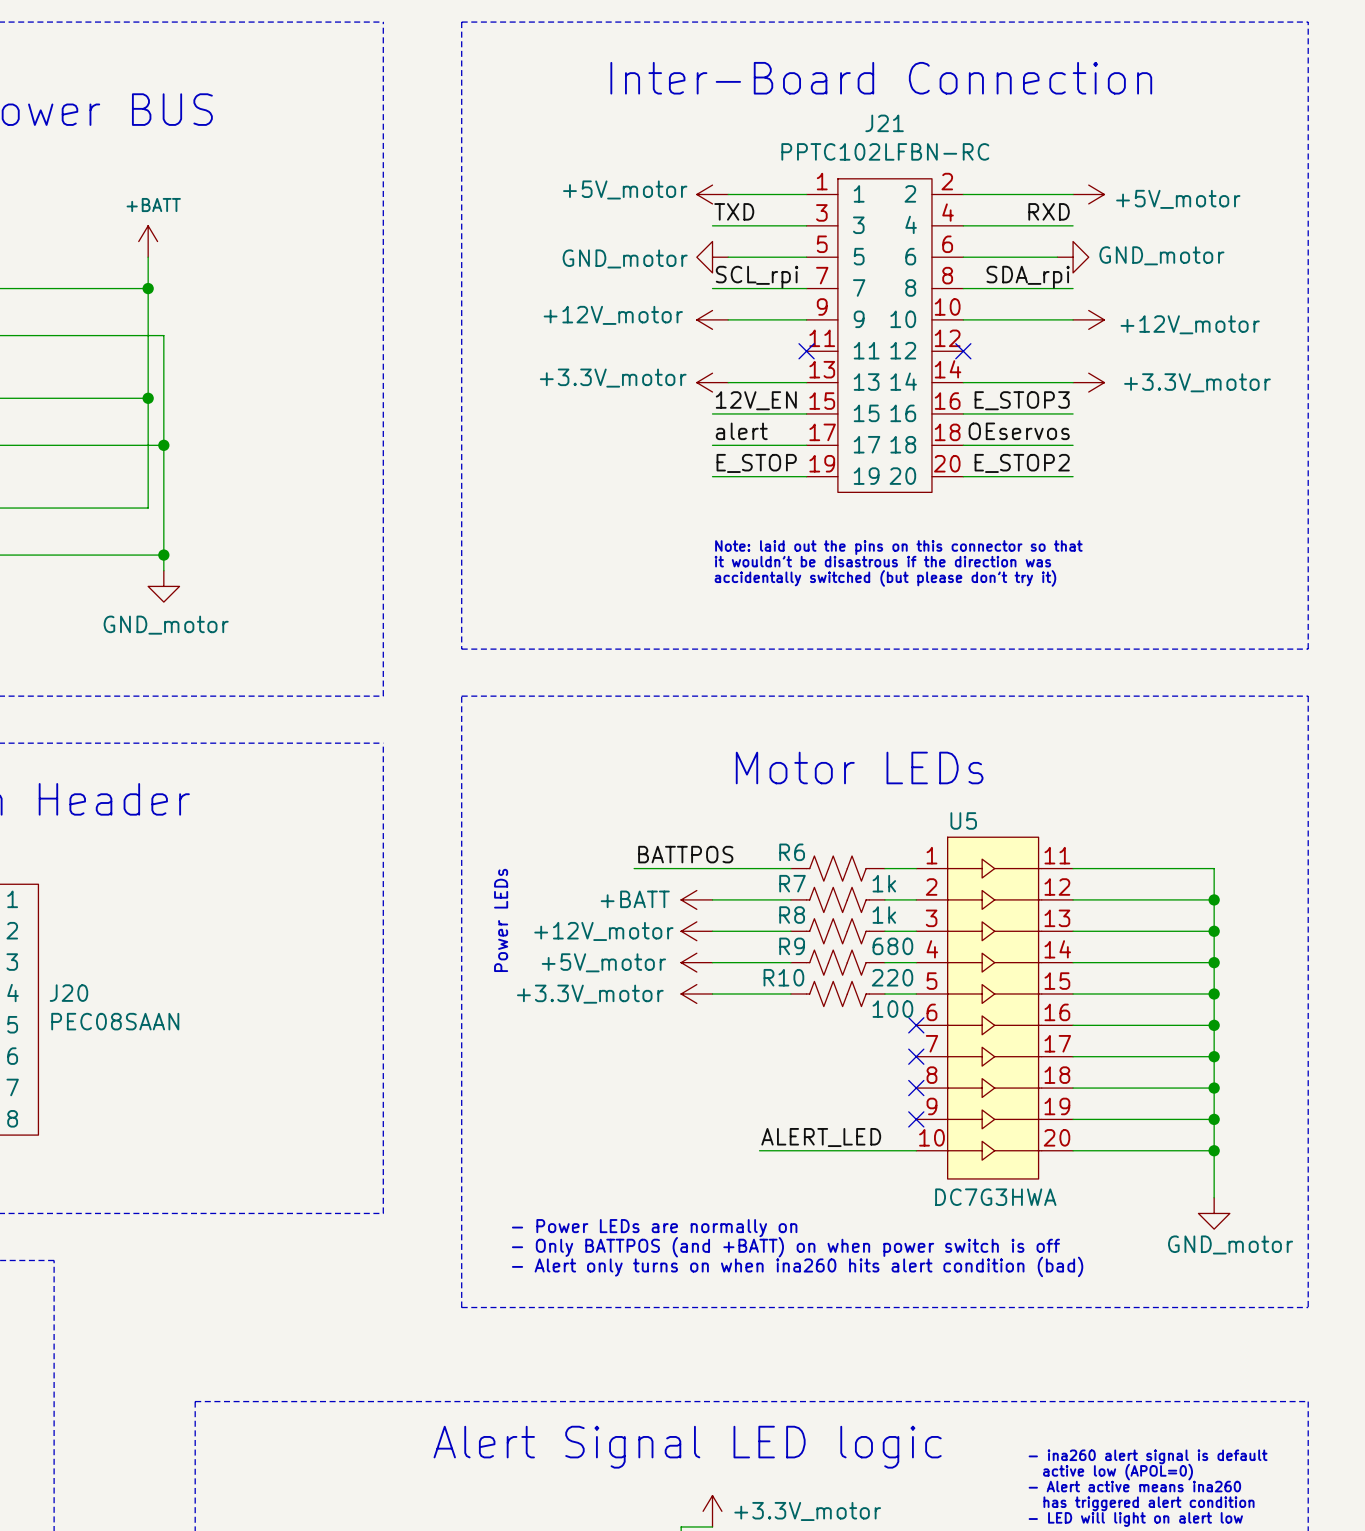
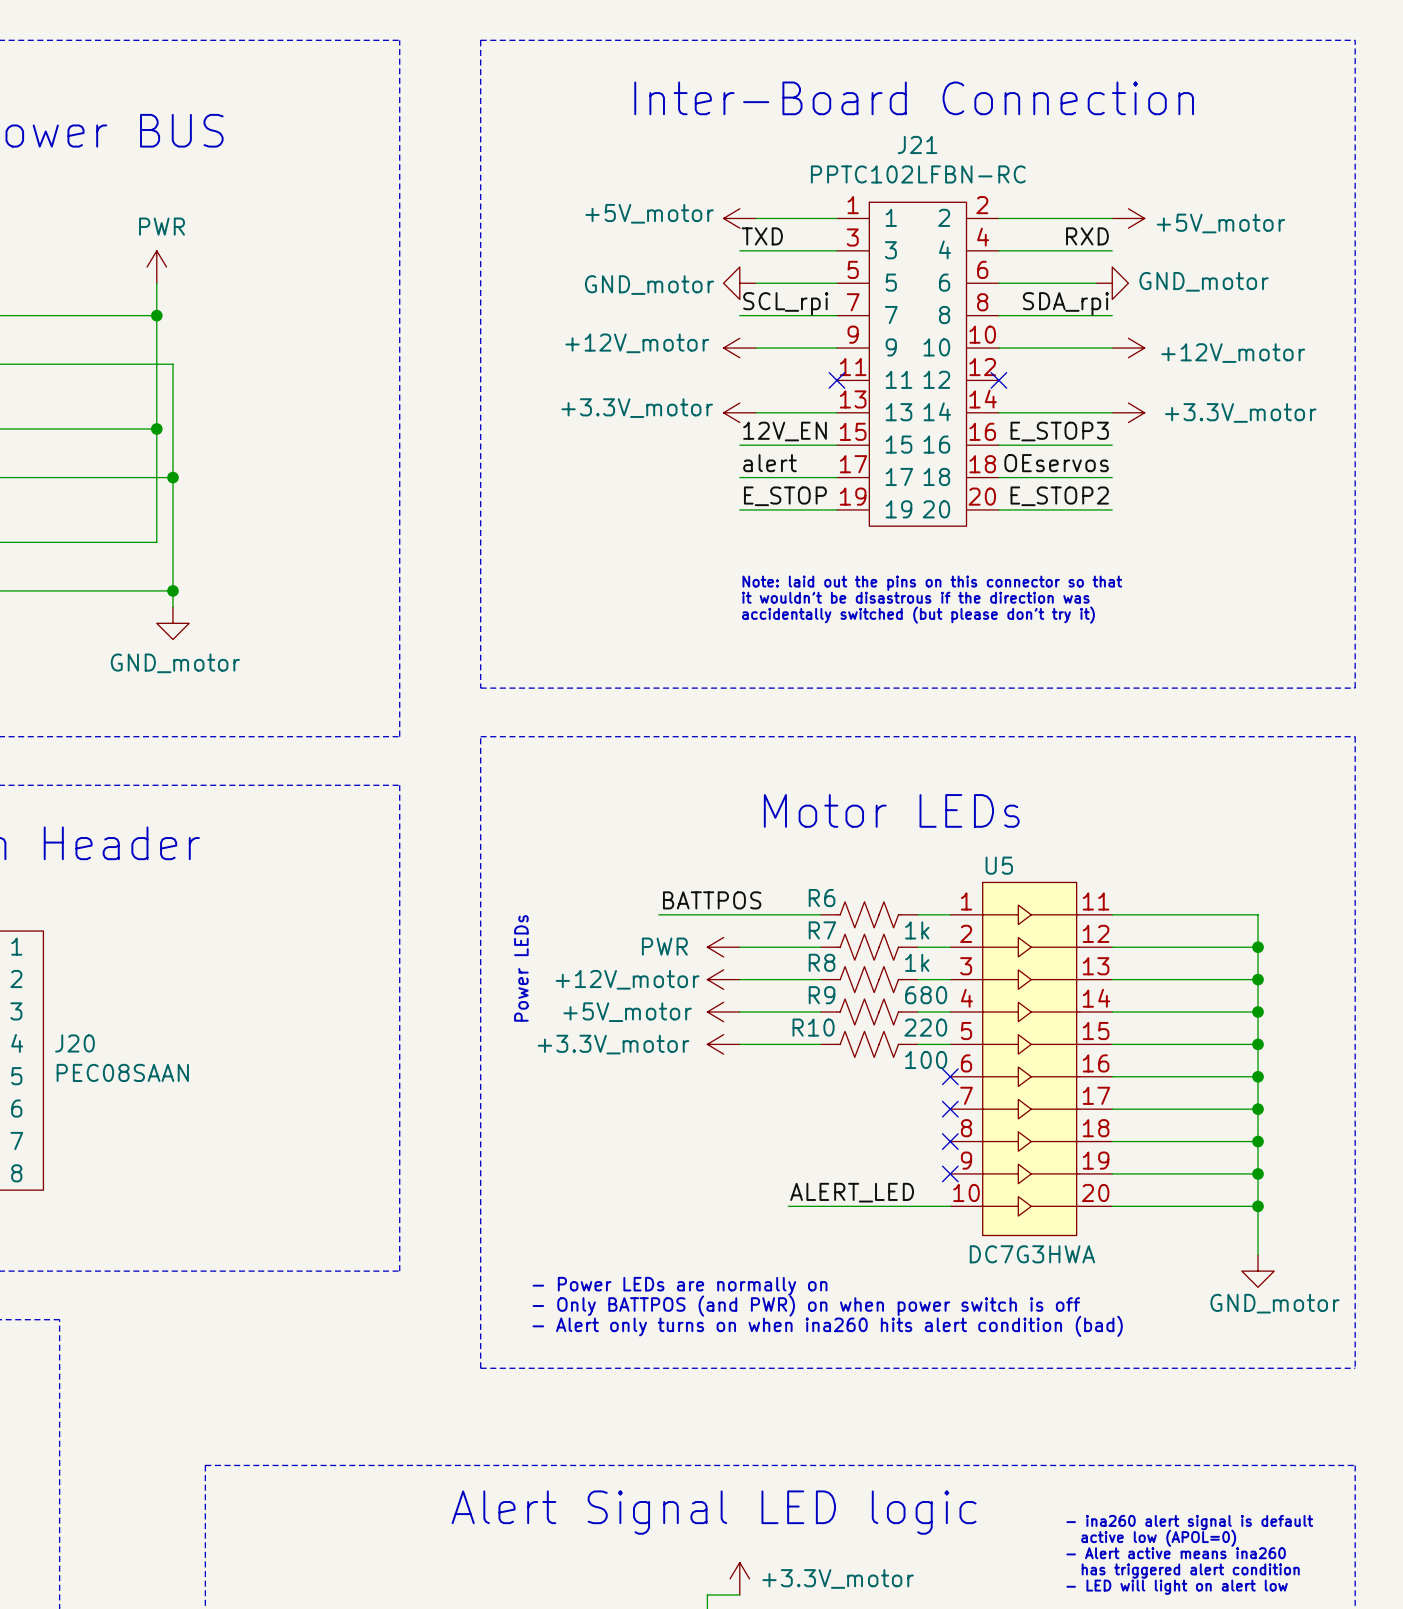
power symbol: +BATT (148, 241) -> PWR (156, 267)
power symbol: +BATT (696, 899) -> PWR (723, 947)
text: - Only BATTPOS (and +BATT) on when power switch is off (785, 1247) -> - Only BATTPOS (and PWR) on when power switch is off (806, 1306)

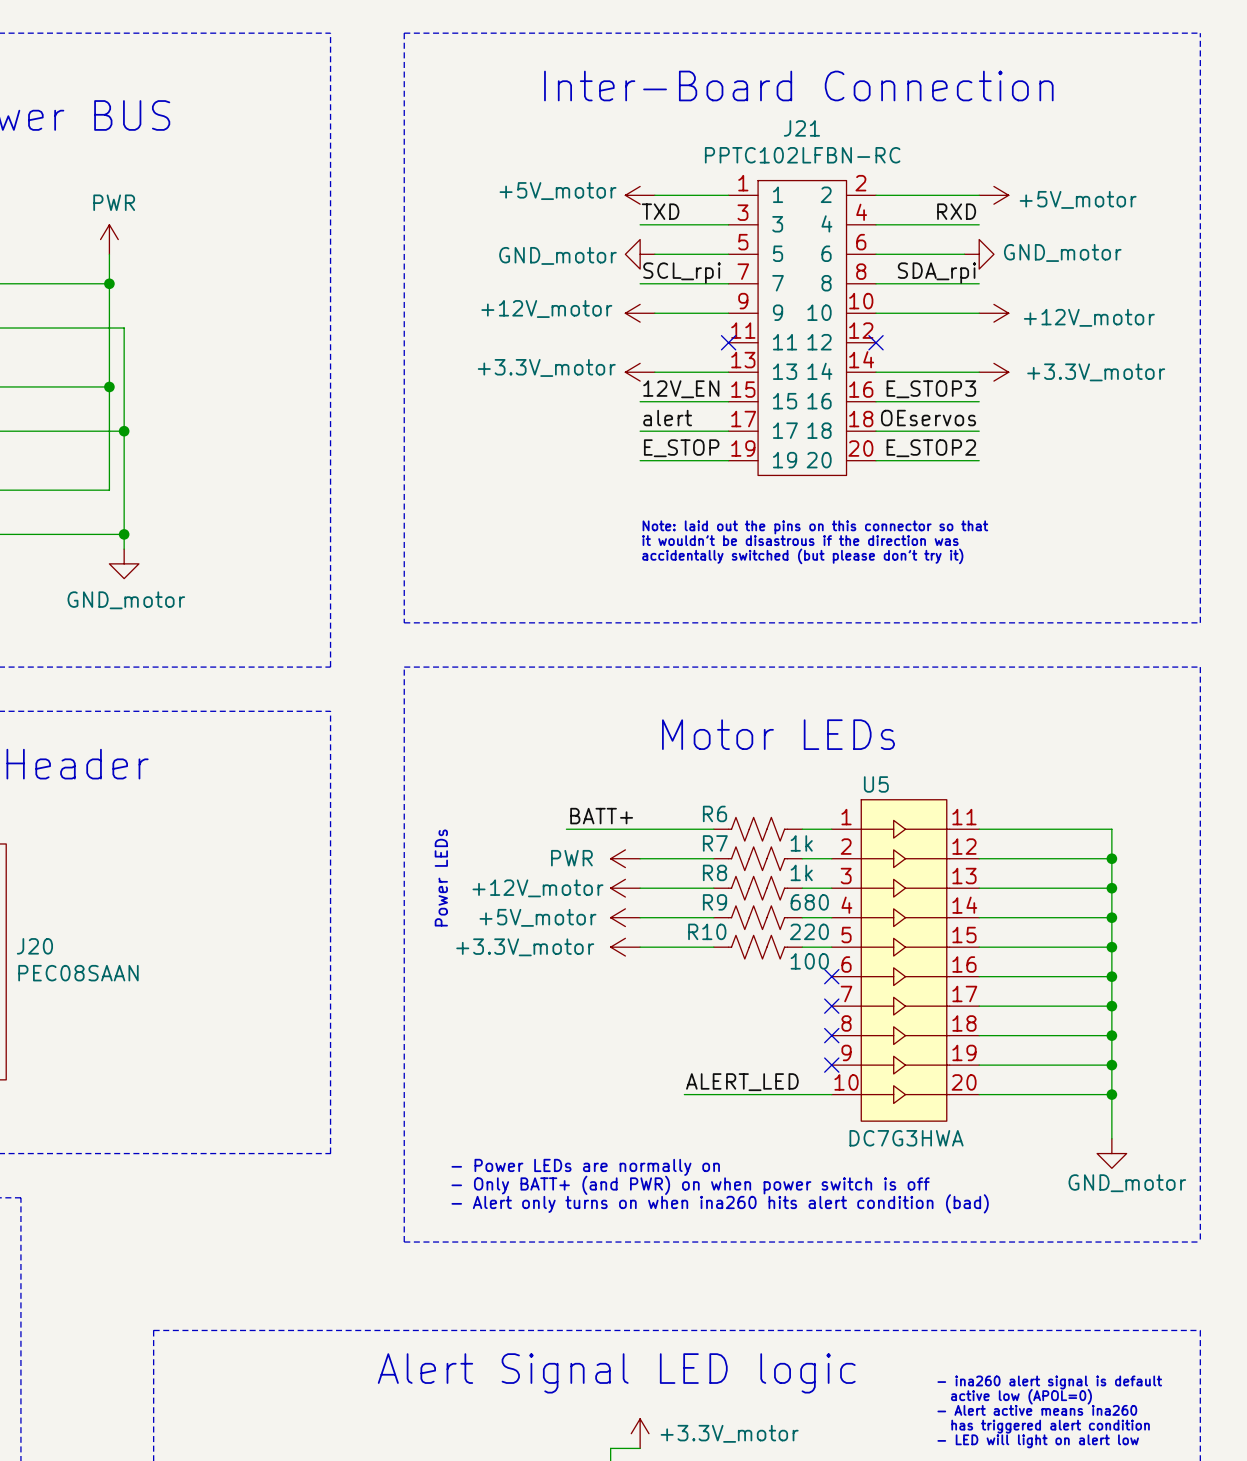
label: BATTPOS (712, 900) -> BATT+ (601, 816)
text: - Only BATTPOS (and PWR) on when power switch is off (806, 1306) -> - Only BATT+ (and PWR) on when power switch is off (690, 1185)

